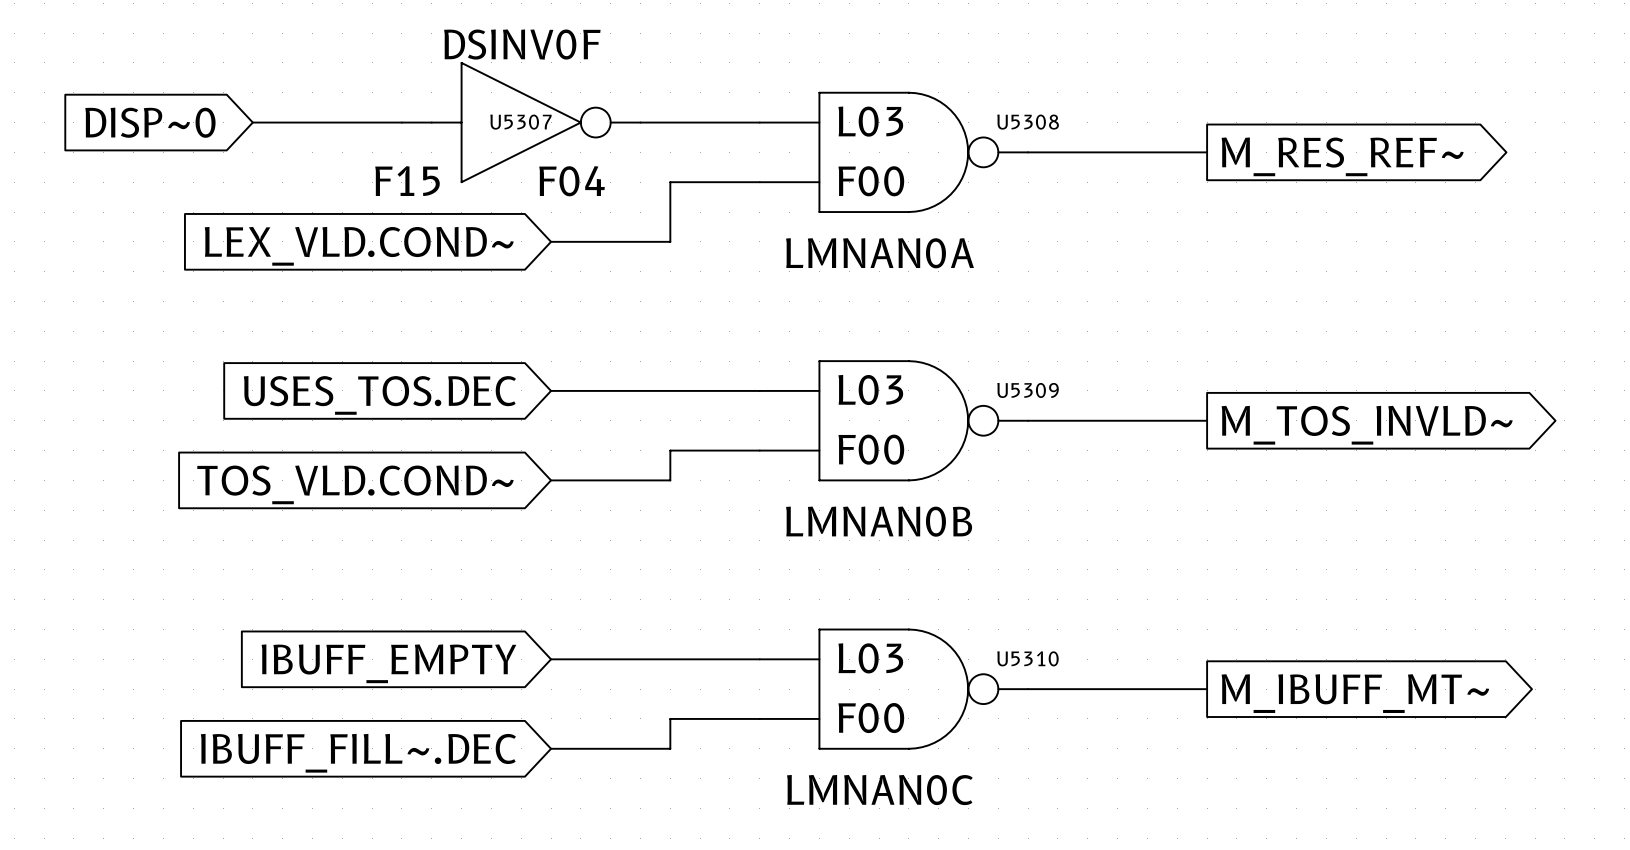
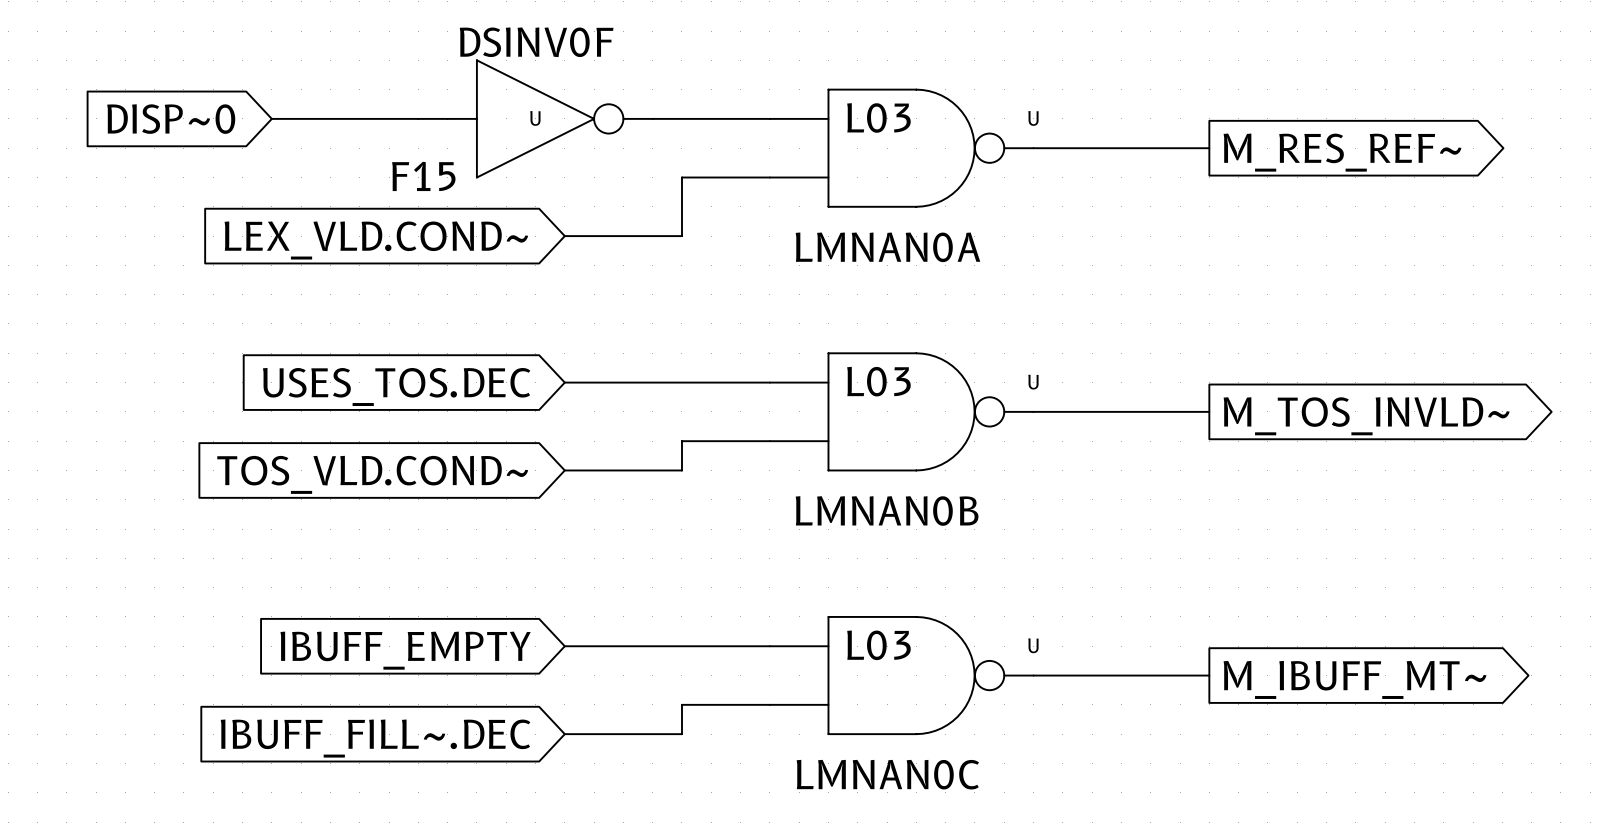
U5307 name: U5307 (520, 122) -> U (535, 118)
U5308 name: U5308 (1028, 122) -> U (1033, 118)
U5307 value: F04 (572, 181) -> none
U5308 value: F00 (871, 181) -> none
U5309 name: U5309 (1028, 390) -> U (1033, 382)
U5309 value: F00 (871, 449) -> none
U5310 name: U5310 (1027, 658) -> U (1033, 645)
U5310 value: F00 (871, 718) -> none

